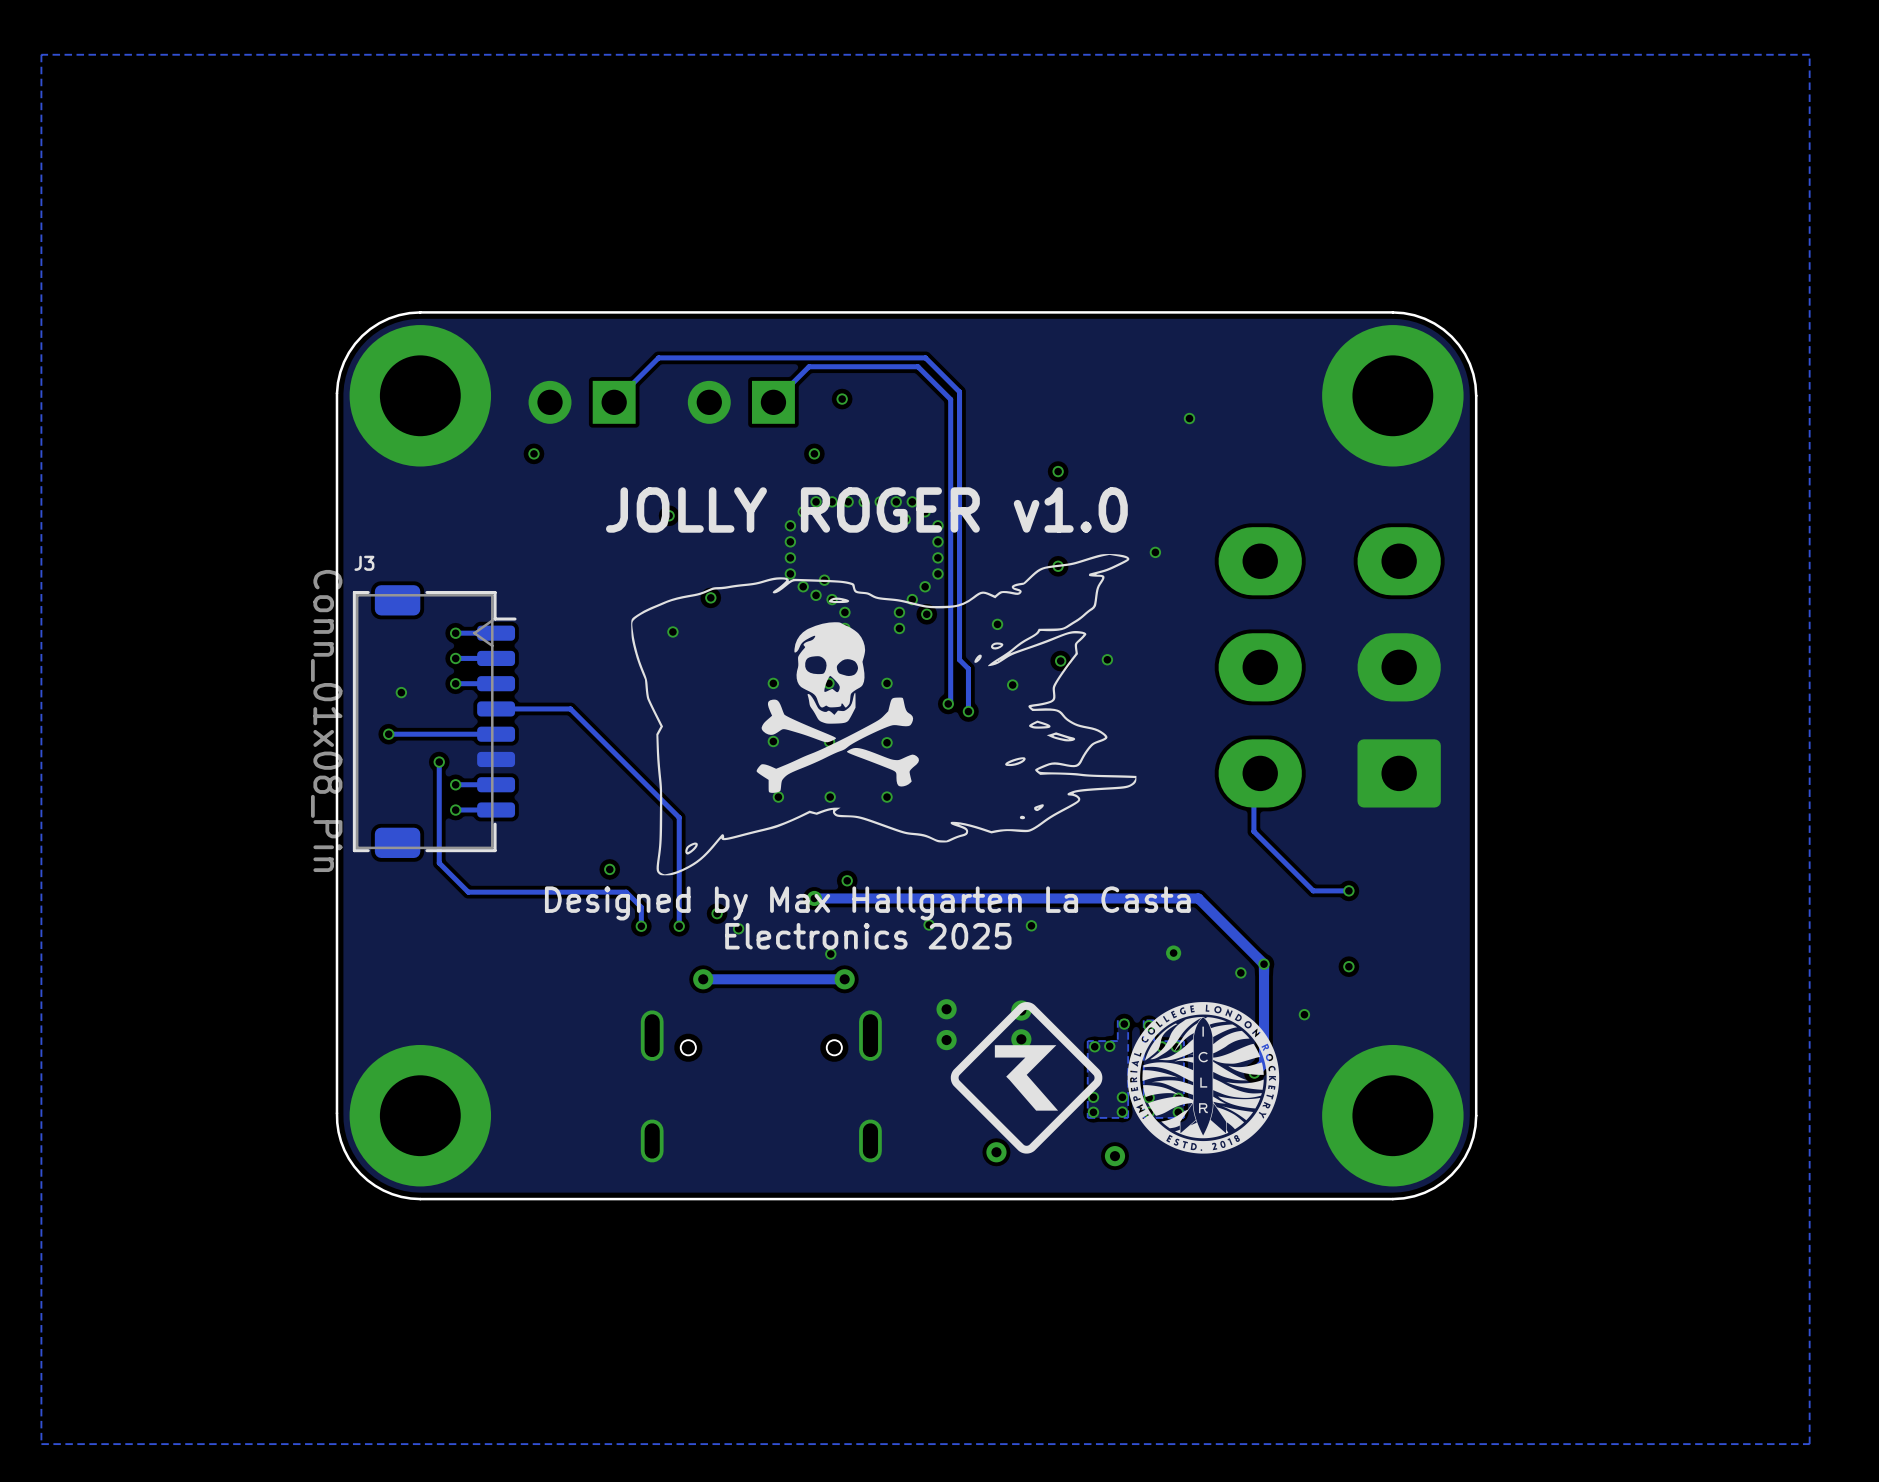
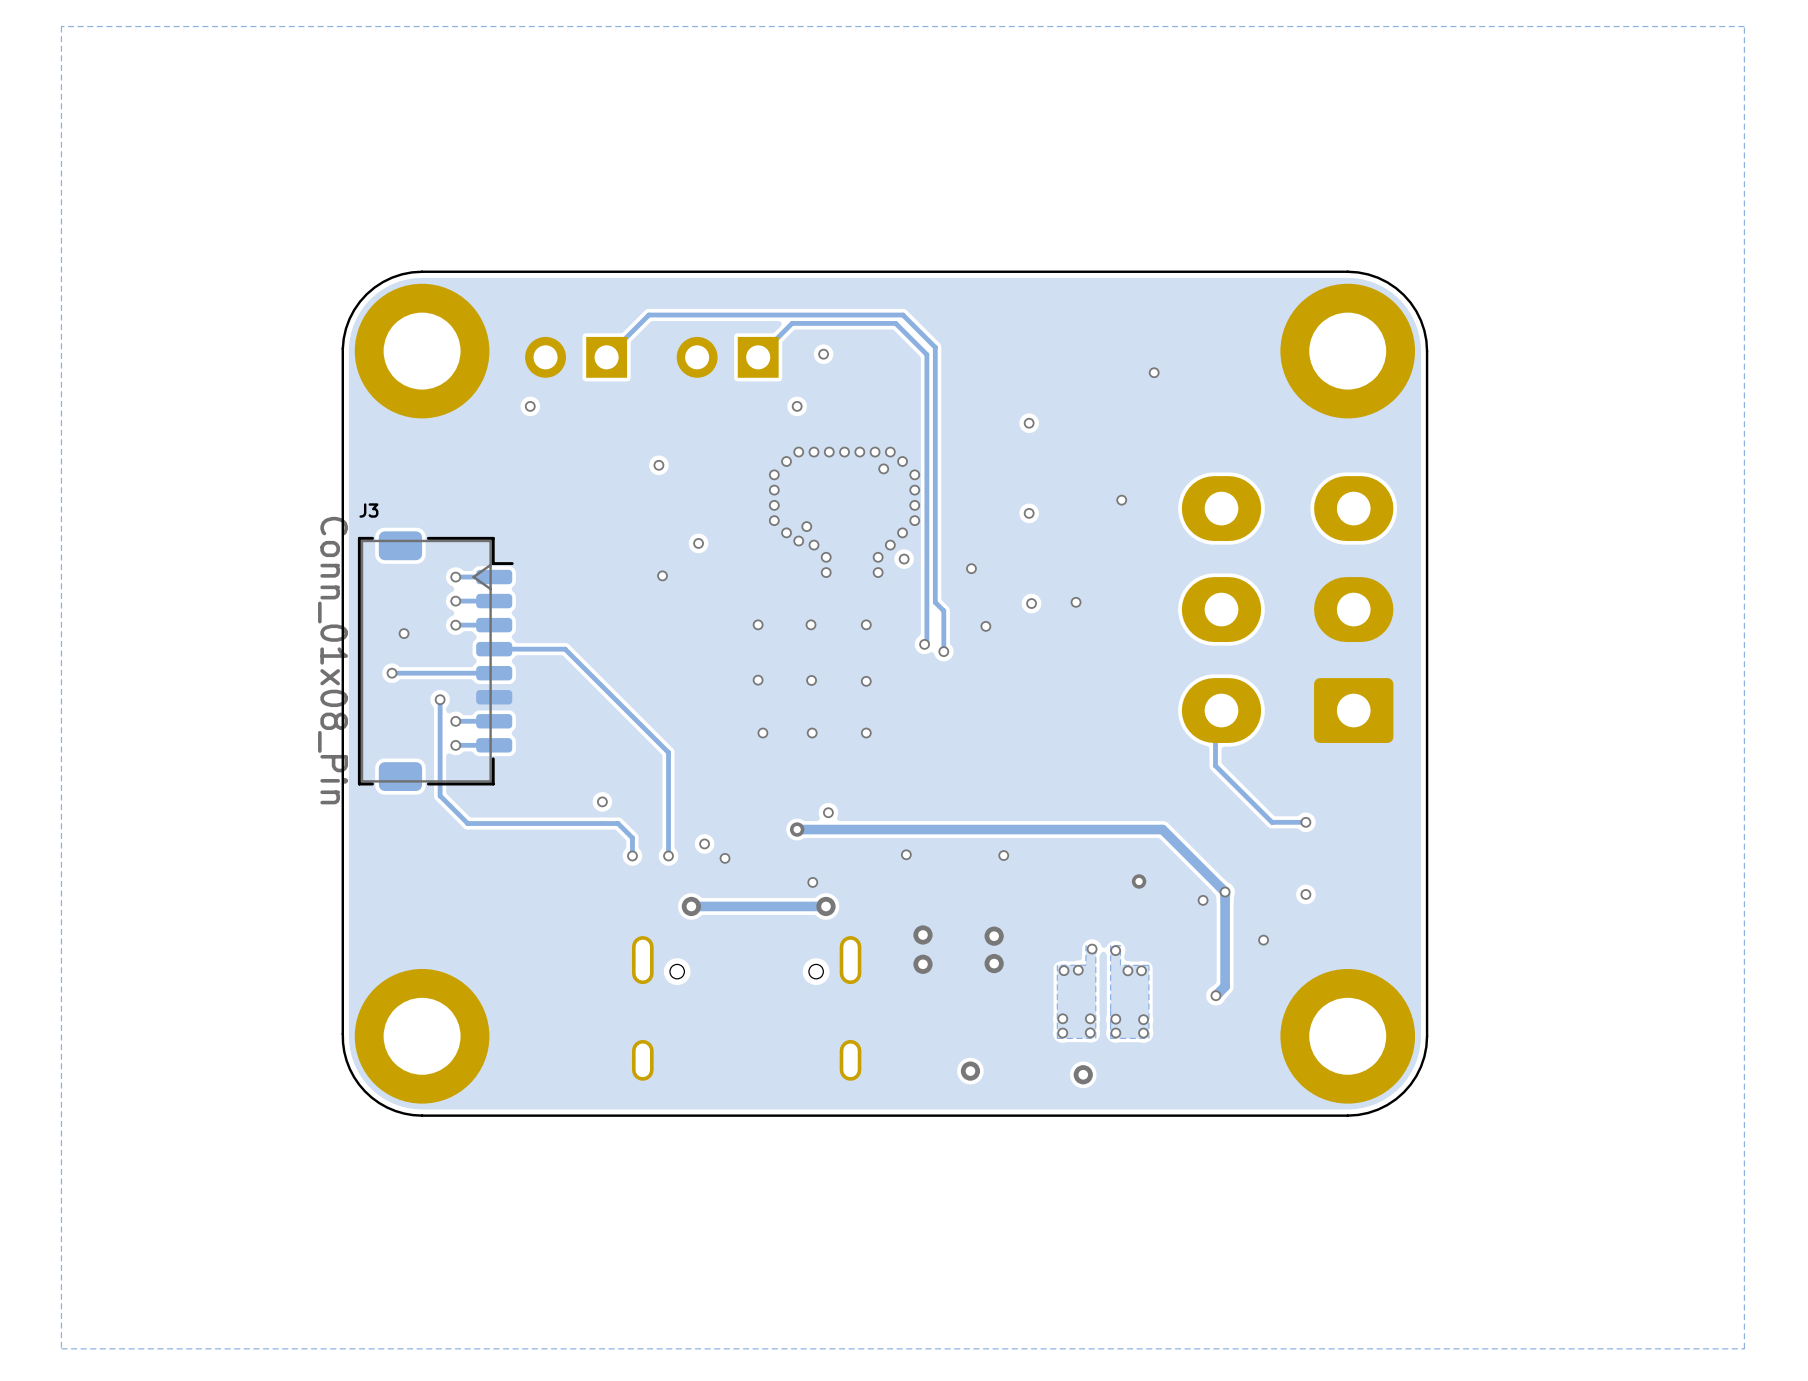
text: JOLLY ROGER v1.0 (866, 509) -> none
drawing: [631, 554, 1137, 876] -> none
text: Designed by Max Hallgarten La Casta (867, 903) -> none
text: Electronics 2025 (868, 936) -> none
drawing: [950, 1002, 1280, 1154] -> none

